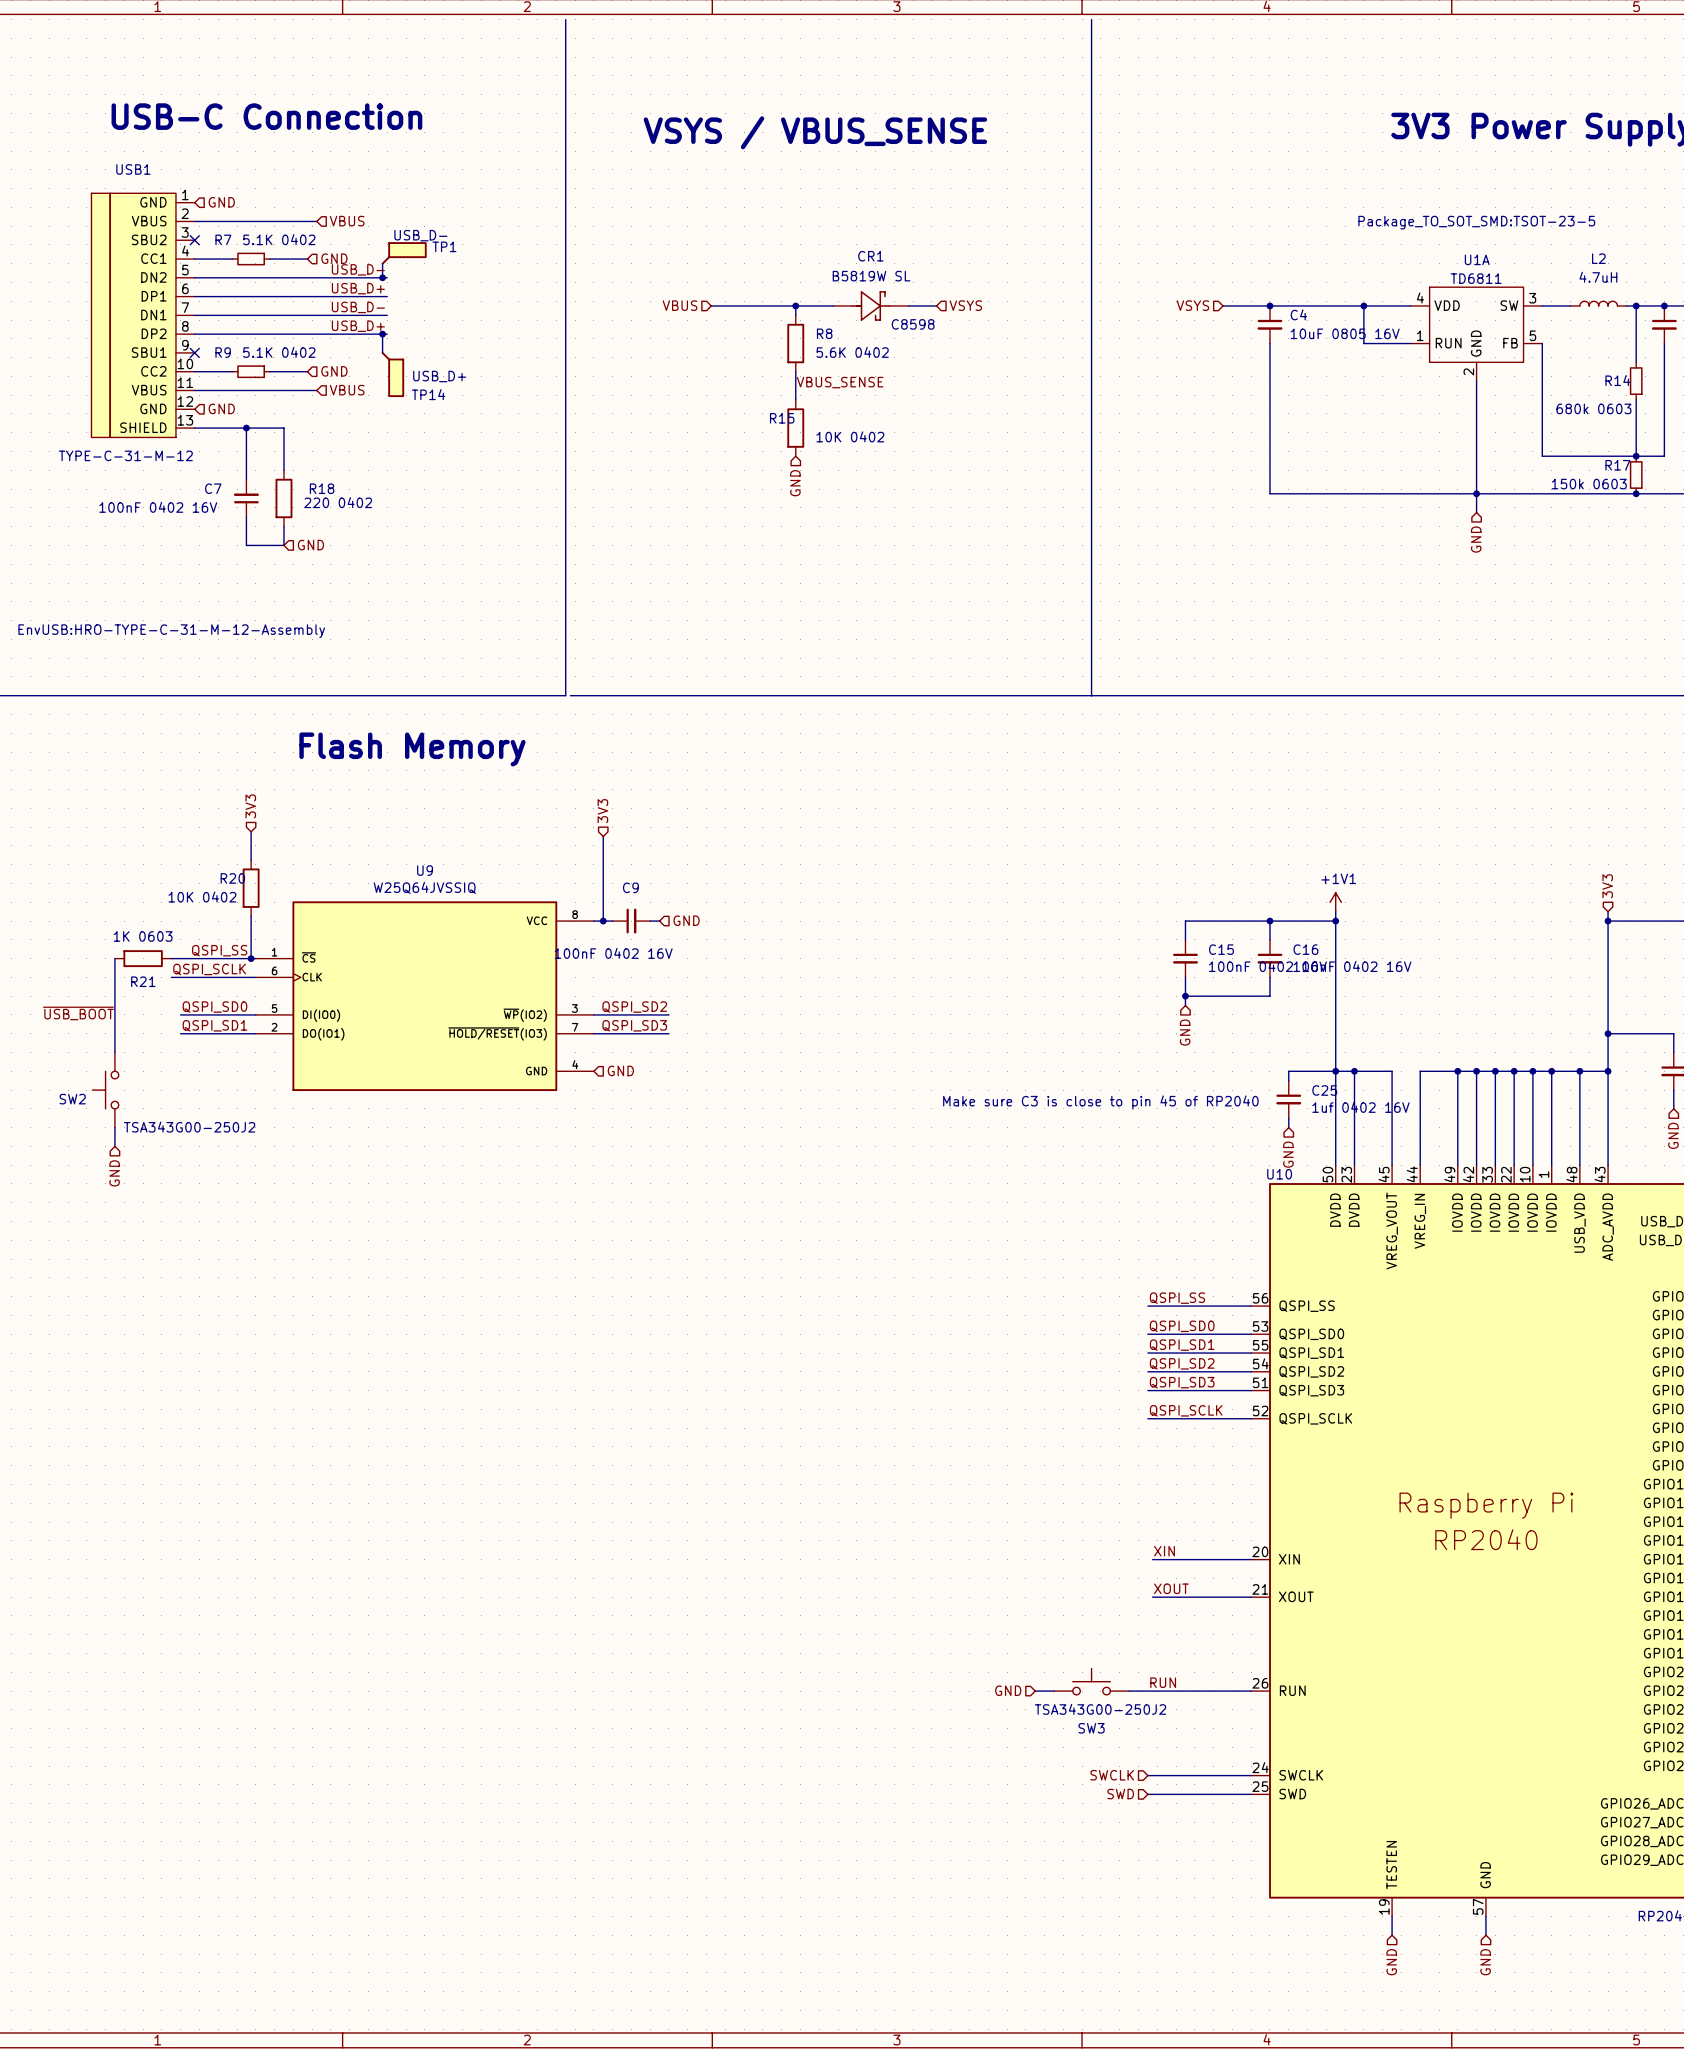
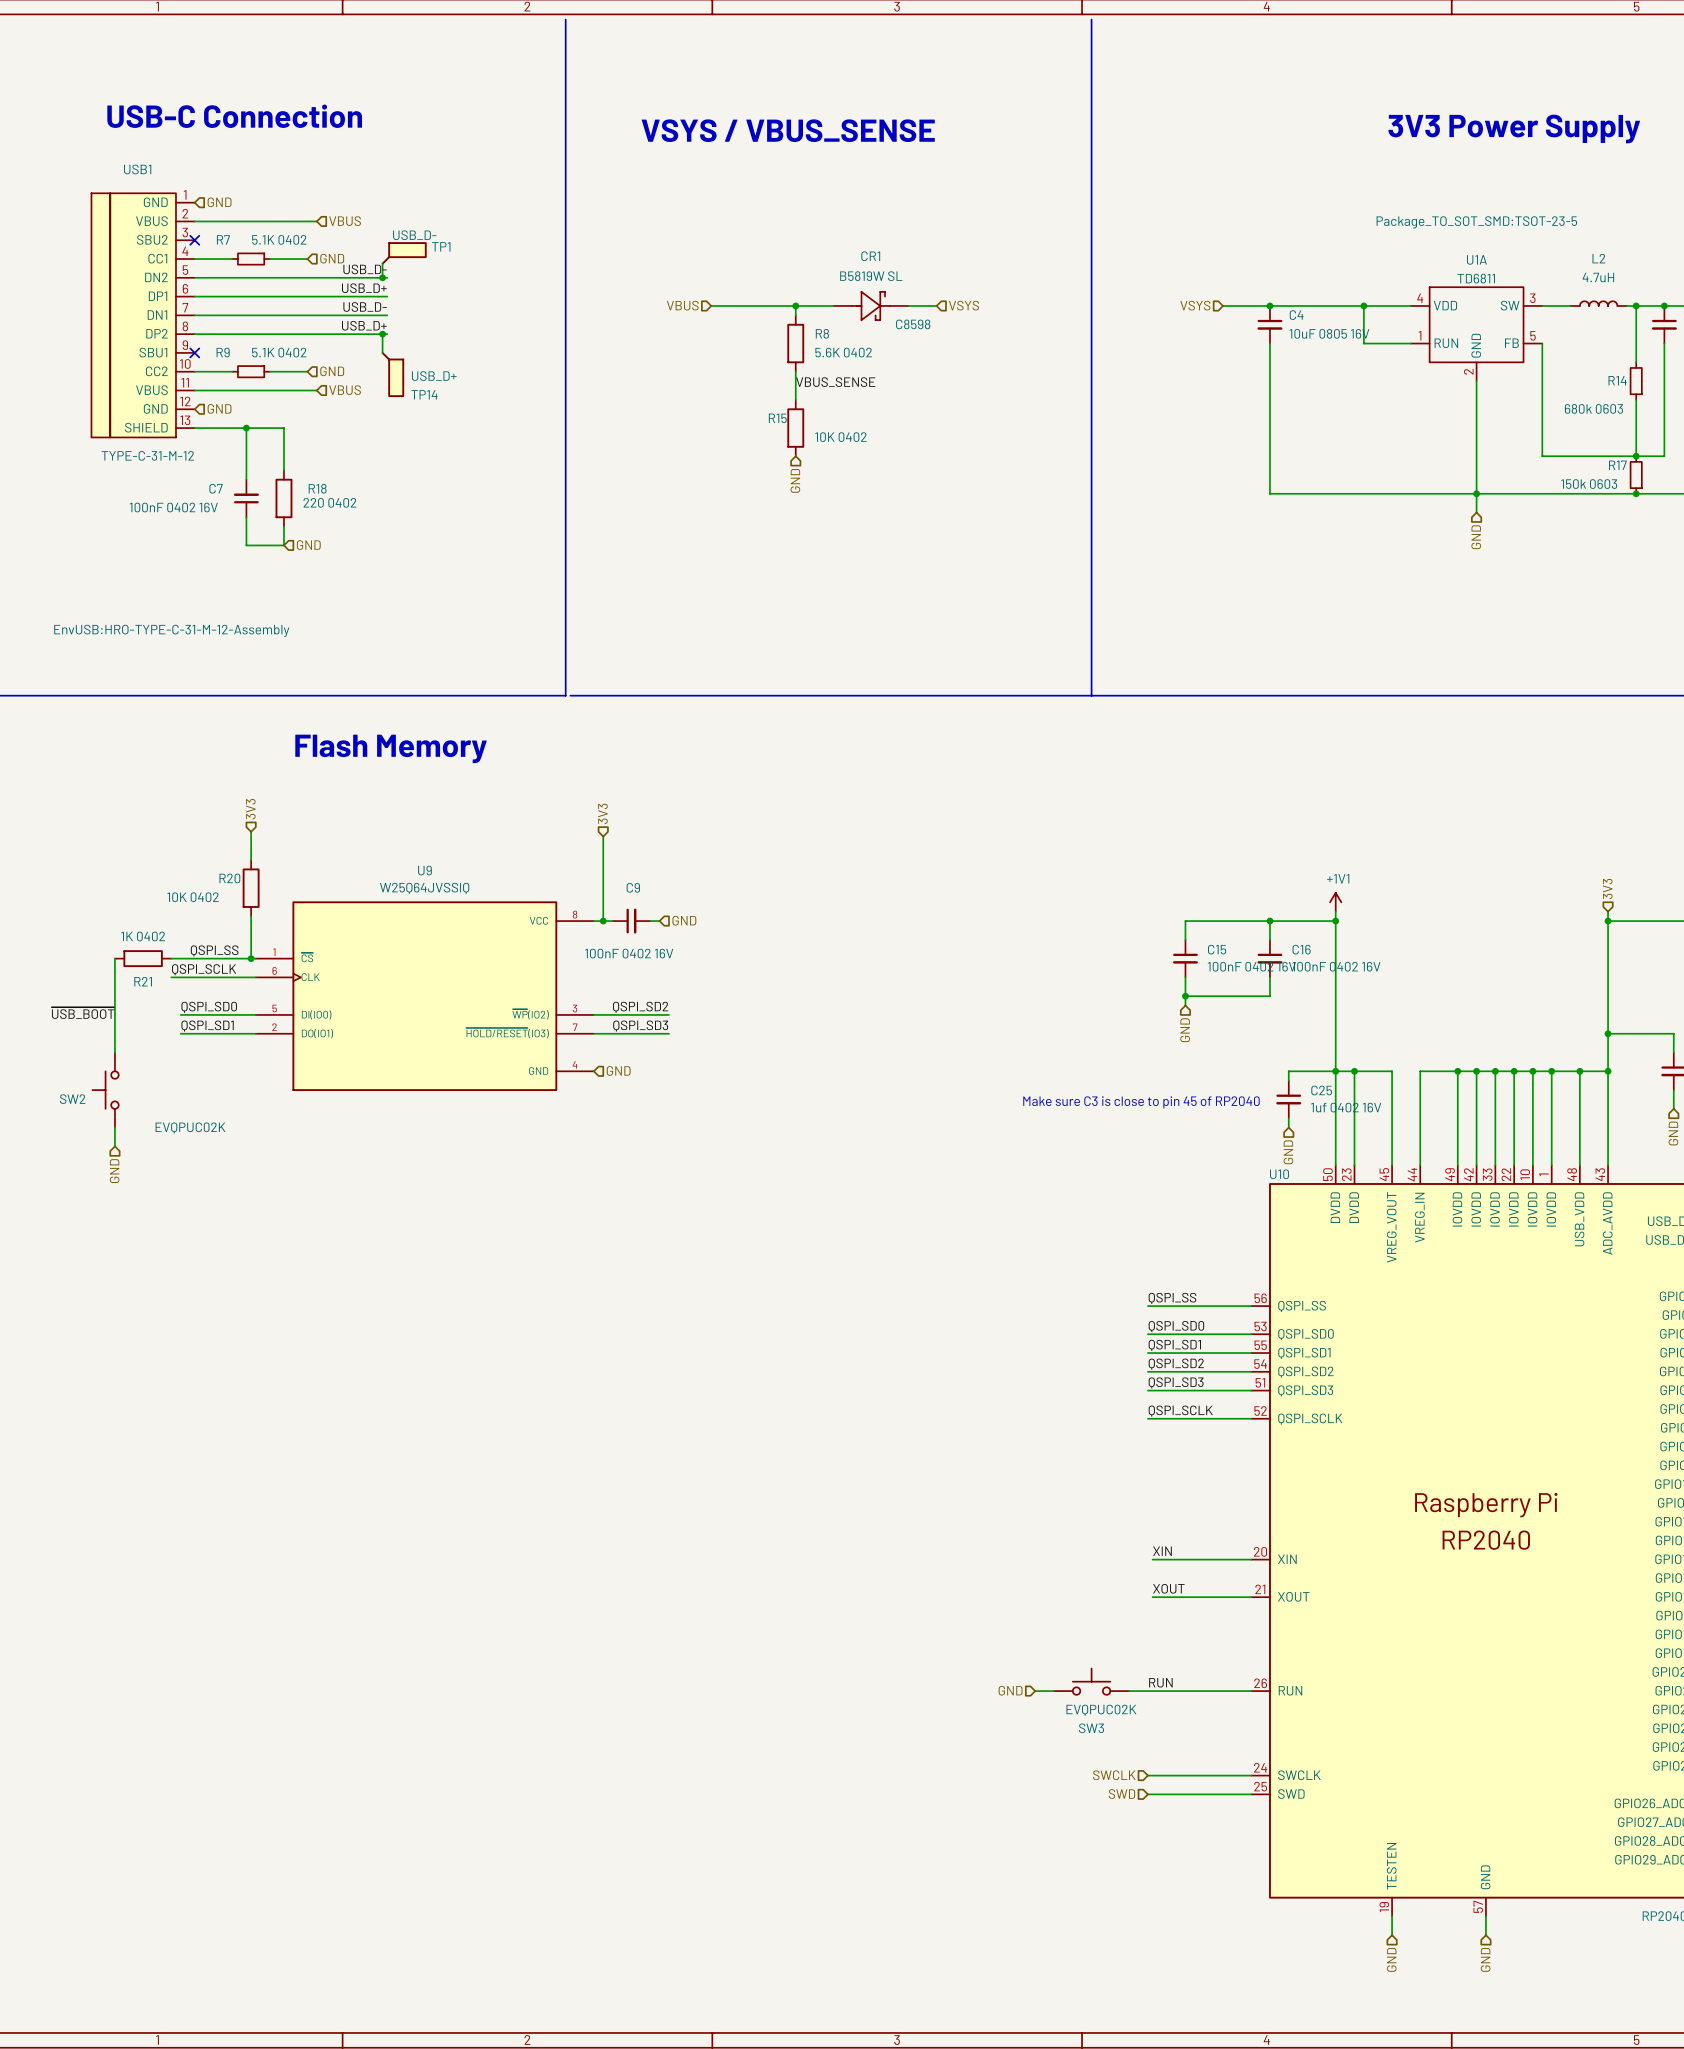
R21 value: 1K 0603 (143, 936) -> 1K 0402 (143, 936)
SW2 value: TSA343G00-250J2 (189, 1127) -> EVQPUC02K (190, 1128)
SW3 value: TSA343G00-250J2 (1100, 1709) -> EVQPUC02K (1101, 1710)

